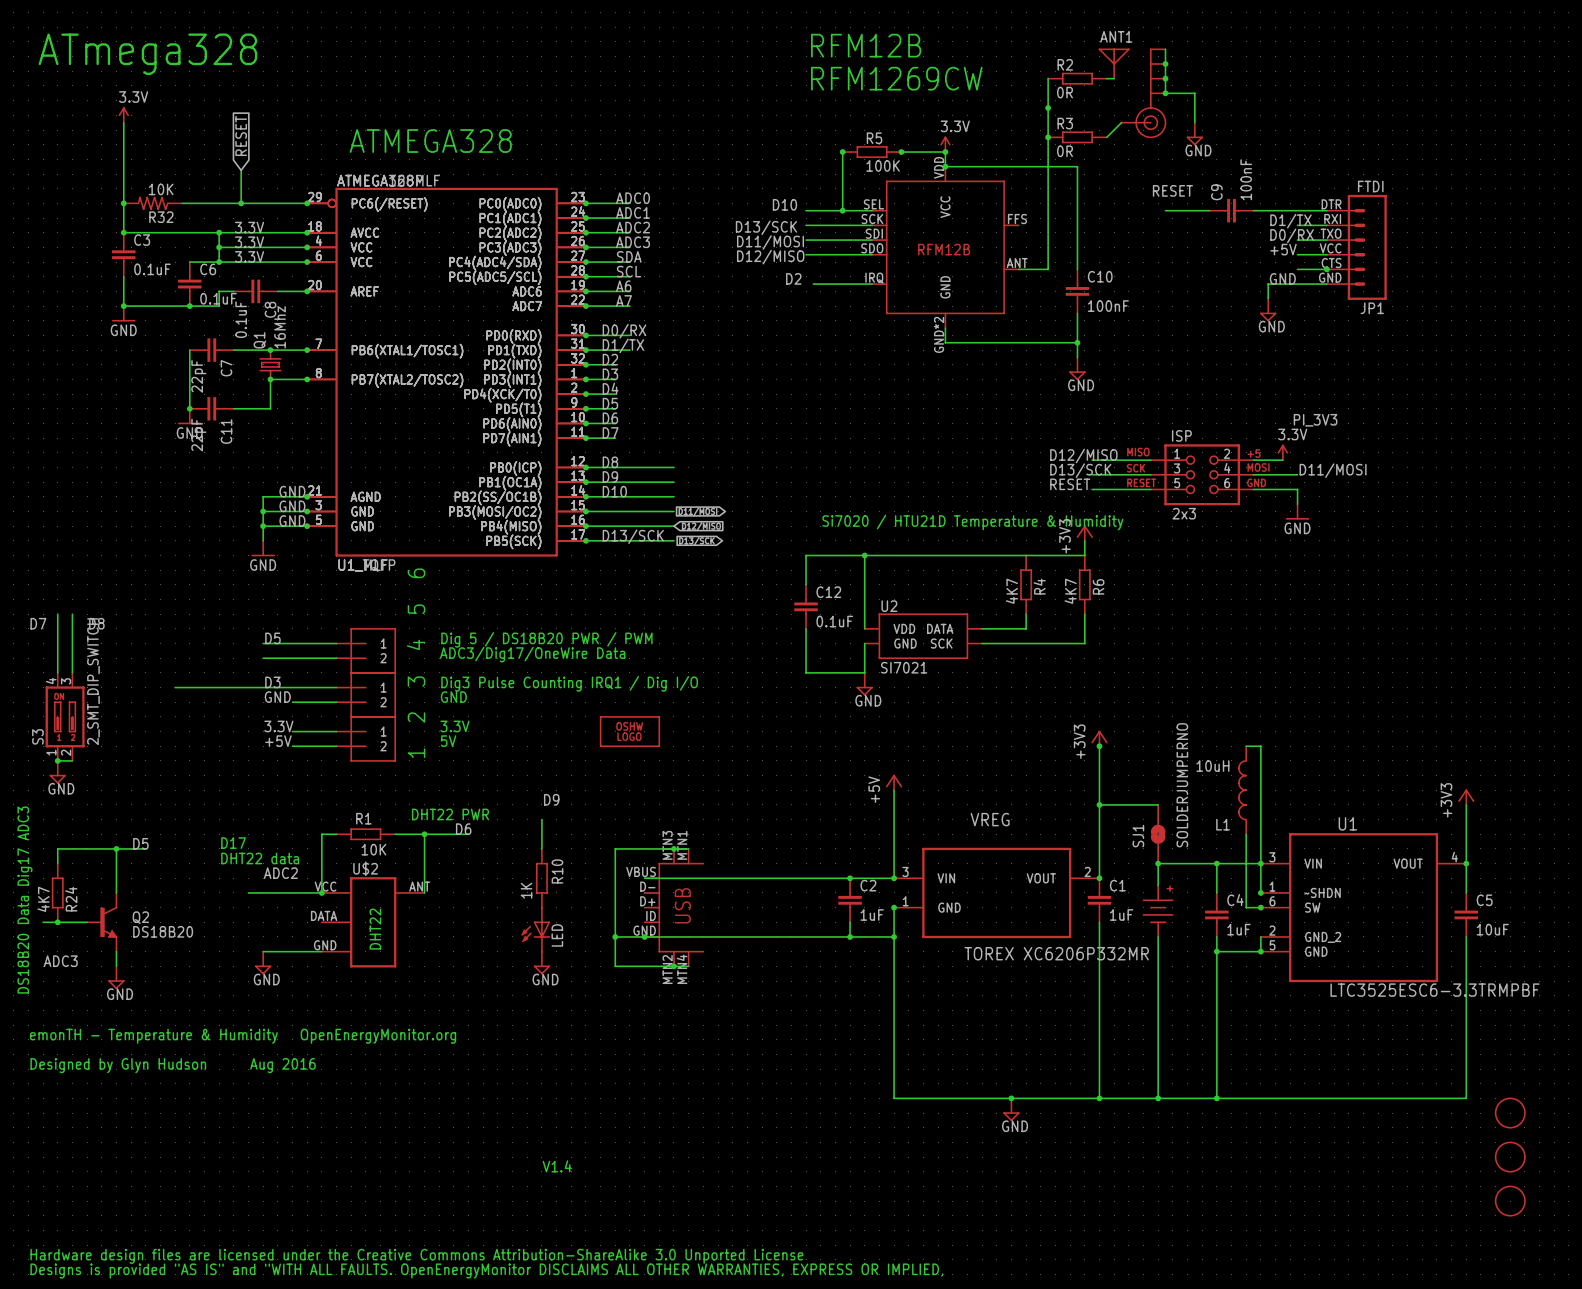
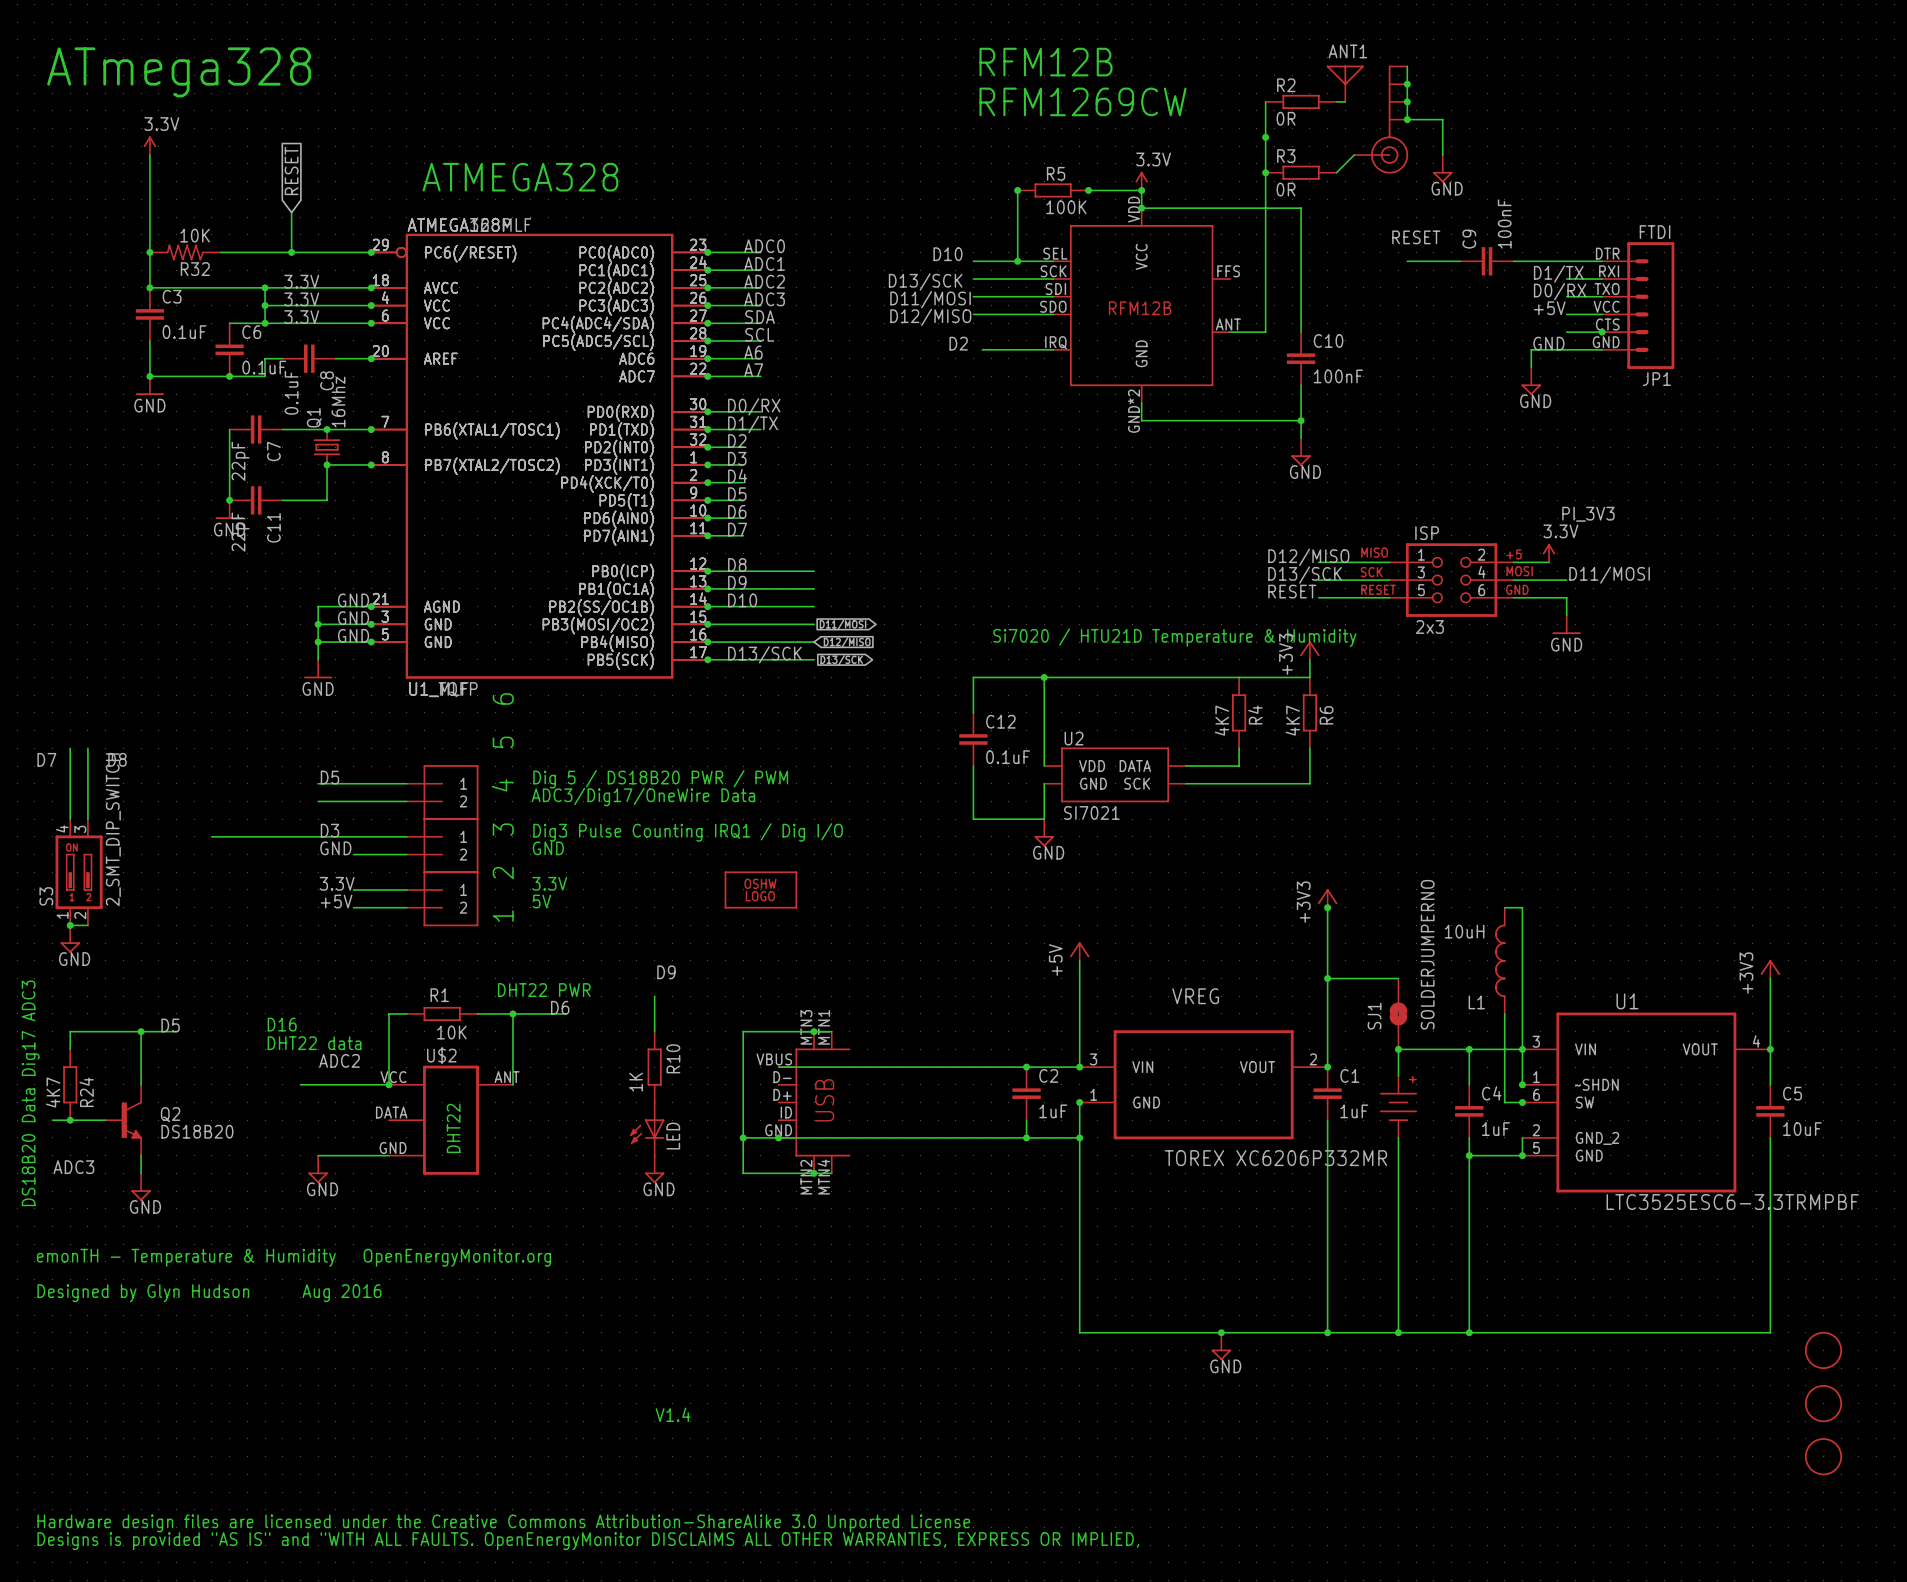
text: D17 (233, 843) -> D16 (282, 1024)

